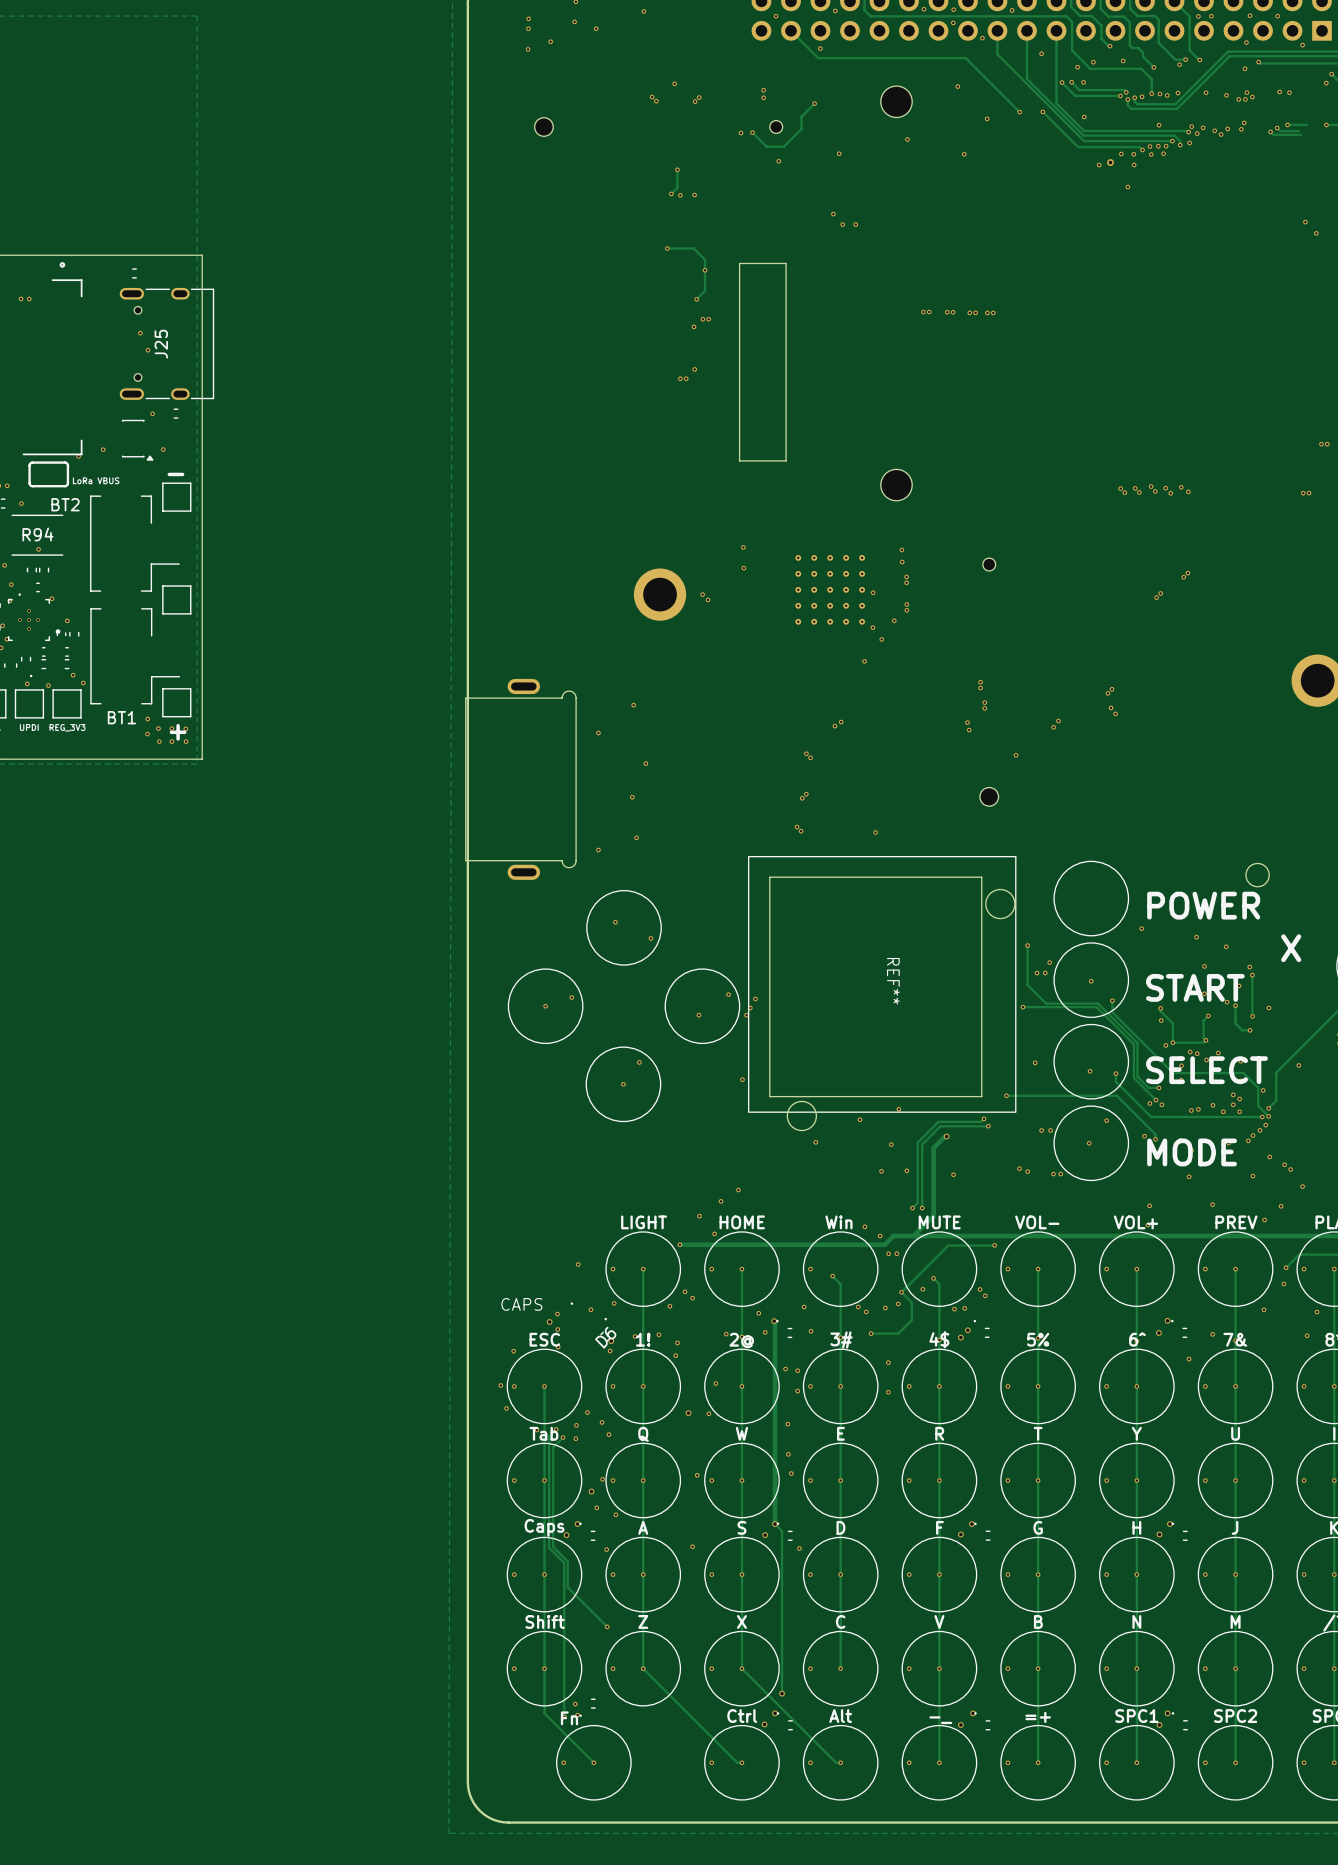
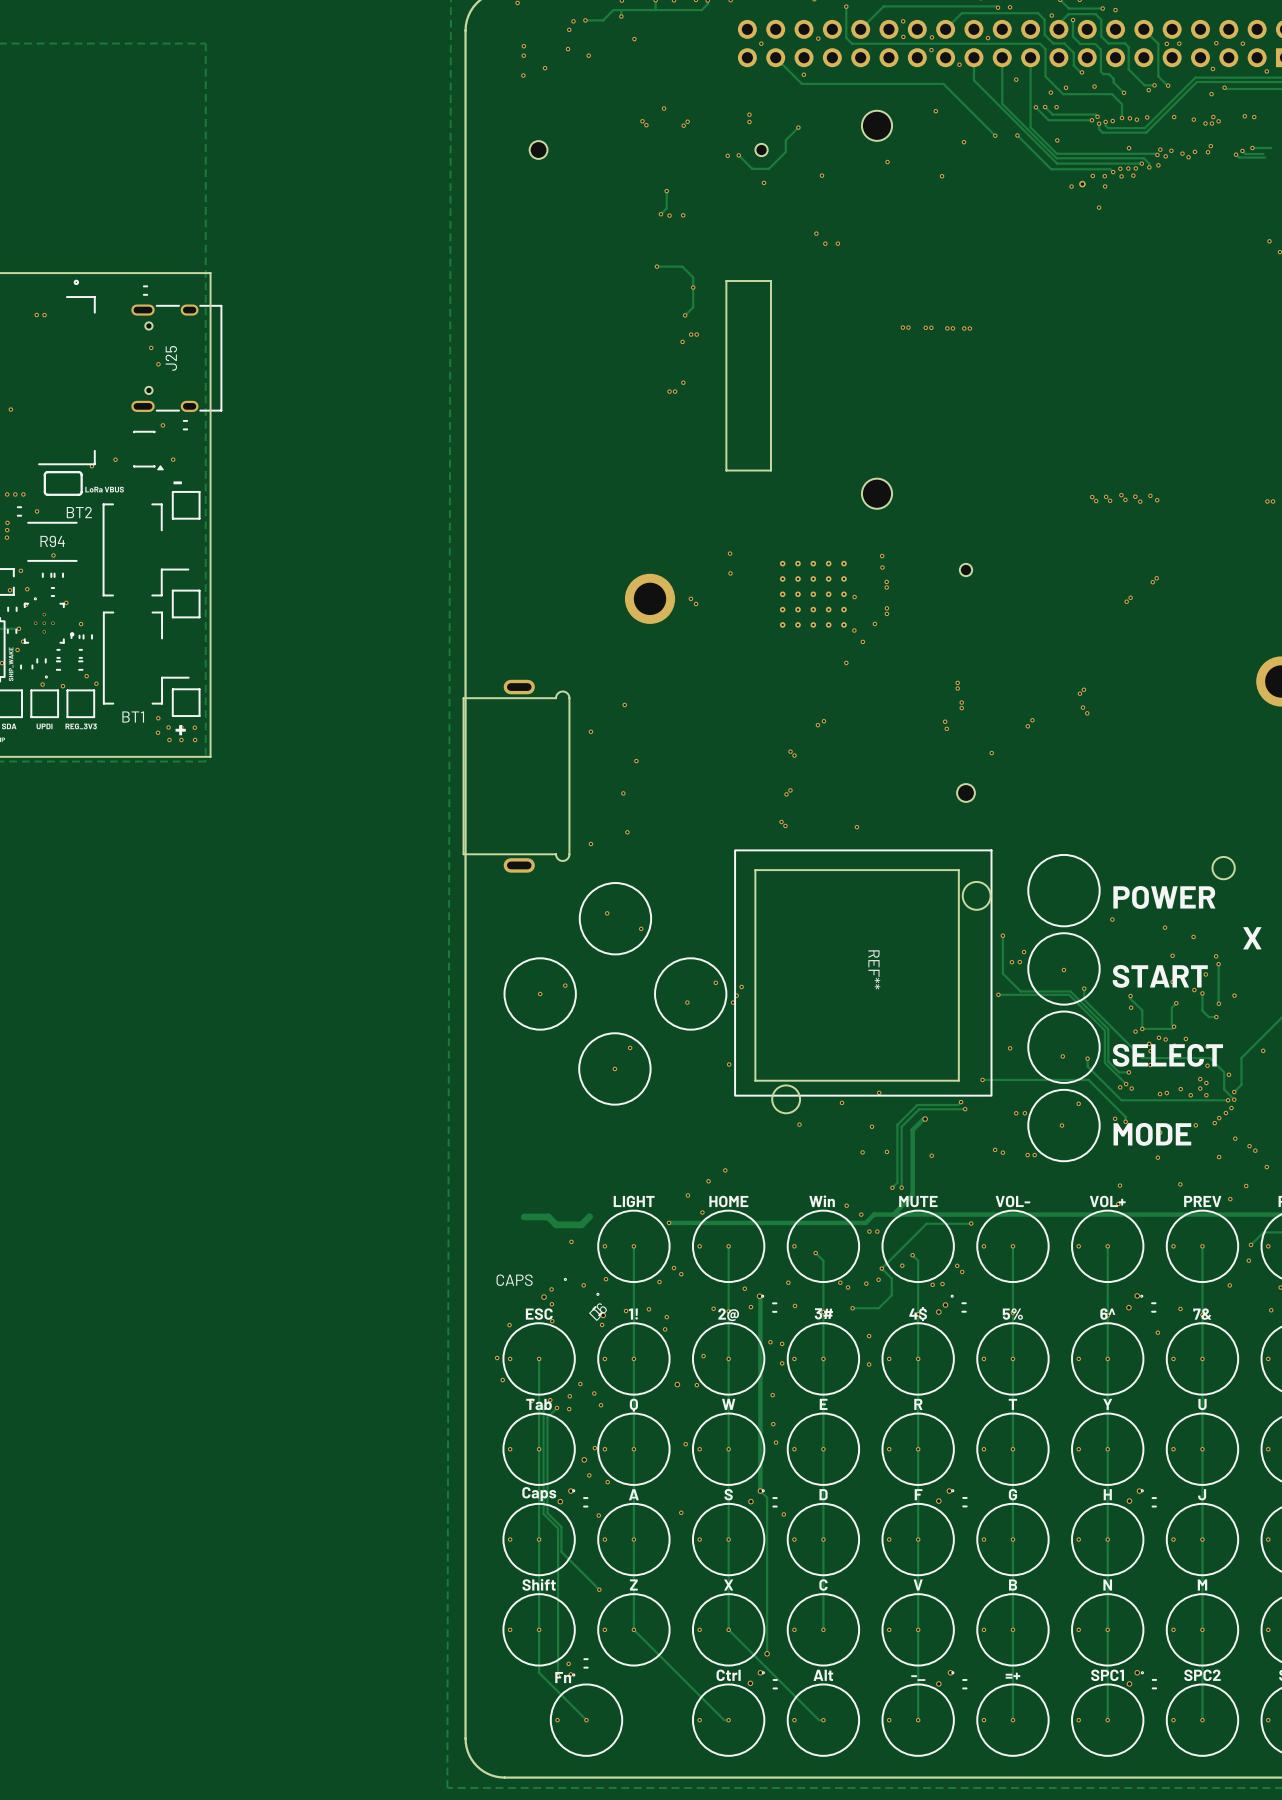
track: none -> (589, 1216) (581, 1224) (556, 1224) (548, 1216) (524, 1216)

